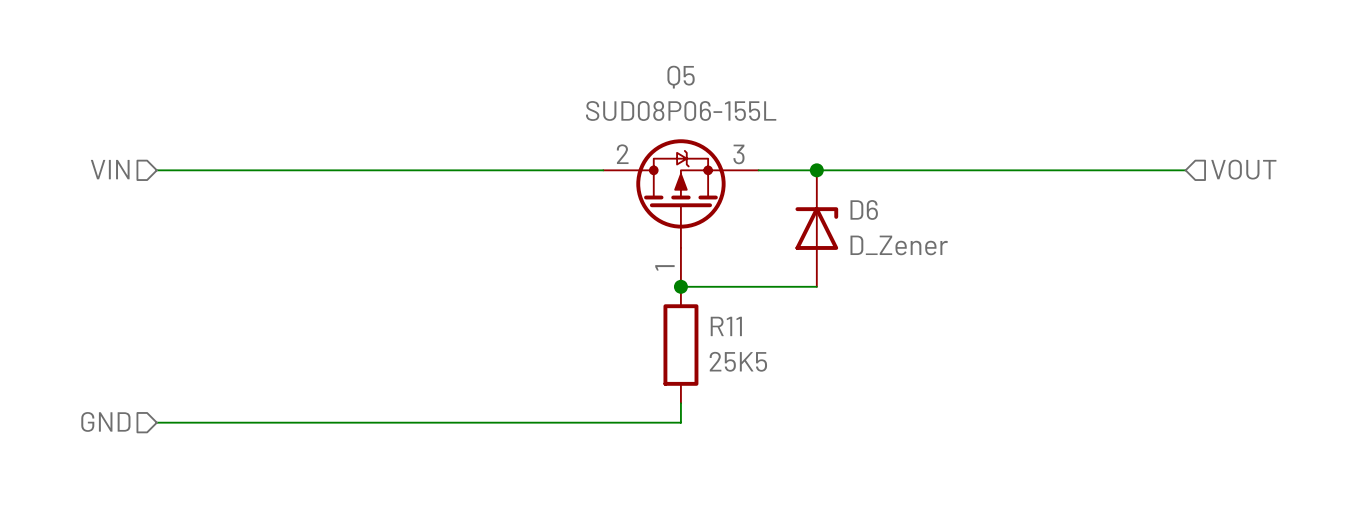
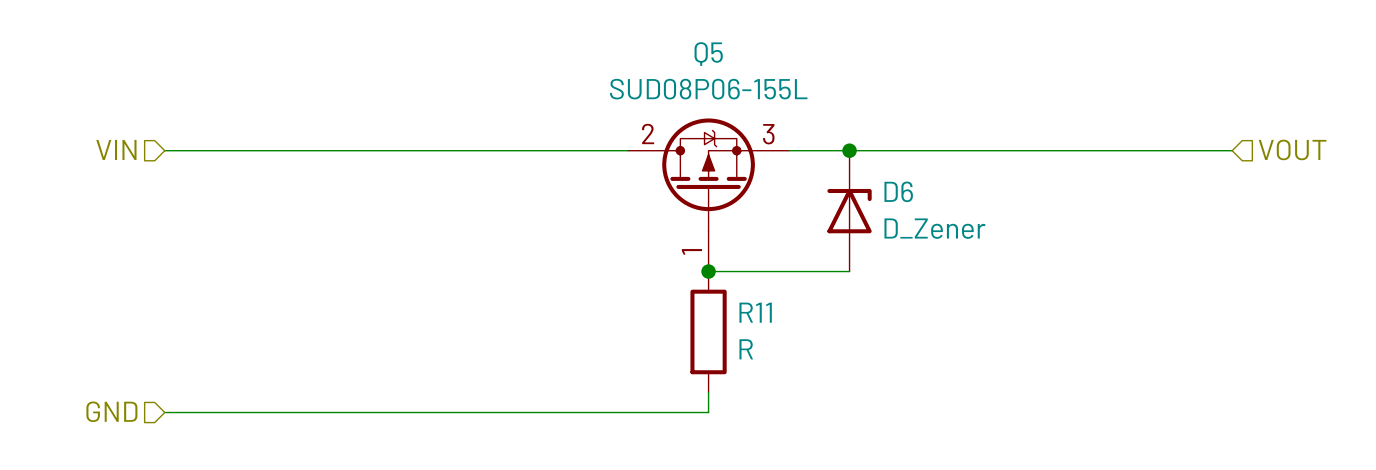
R11 value: 25K5 (738, 361) -> R (746, 349)

